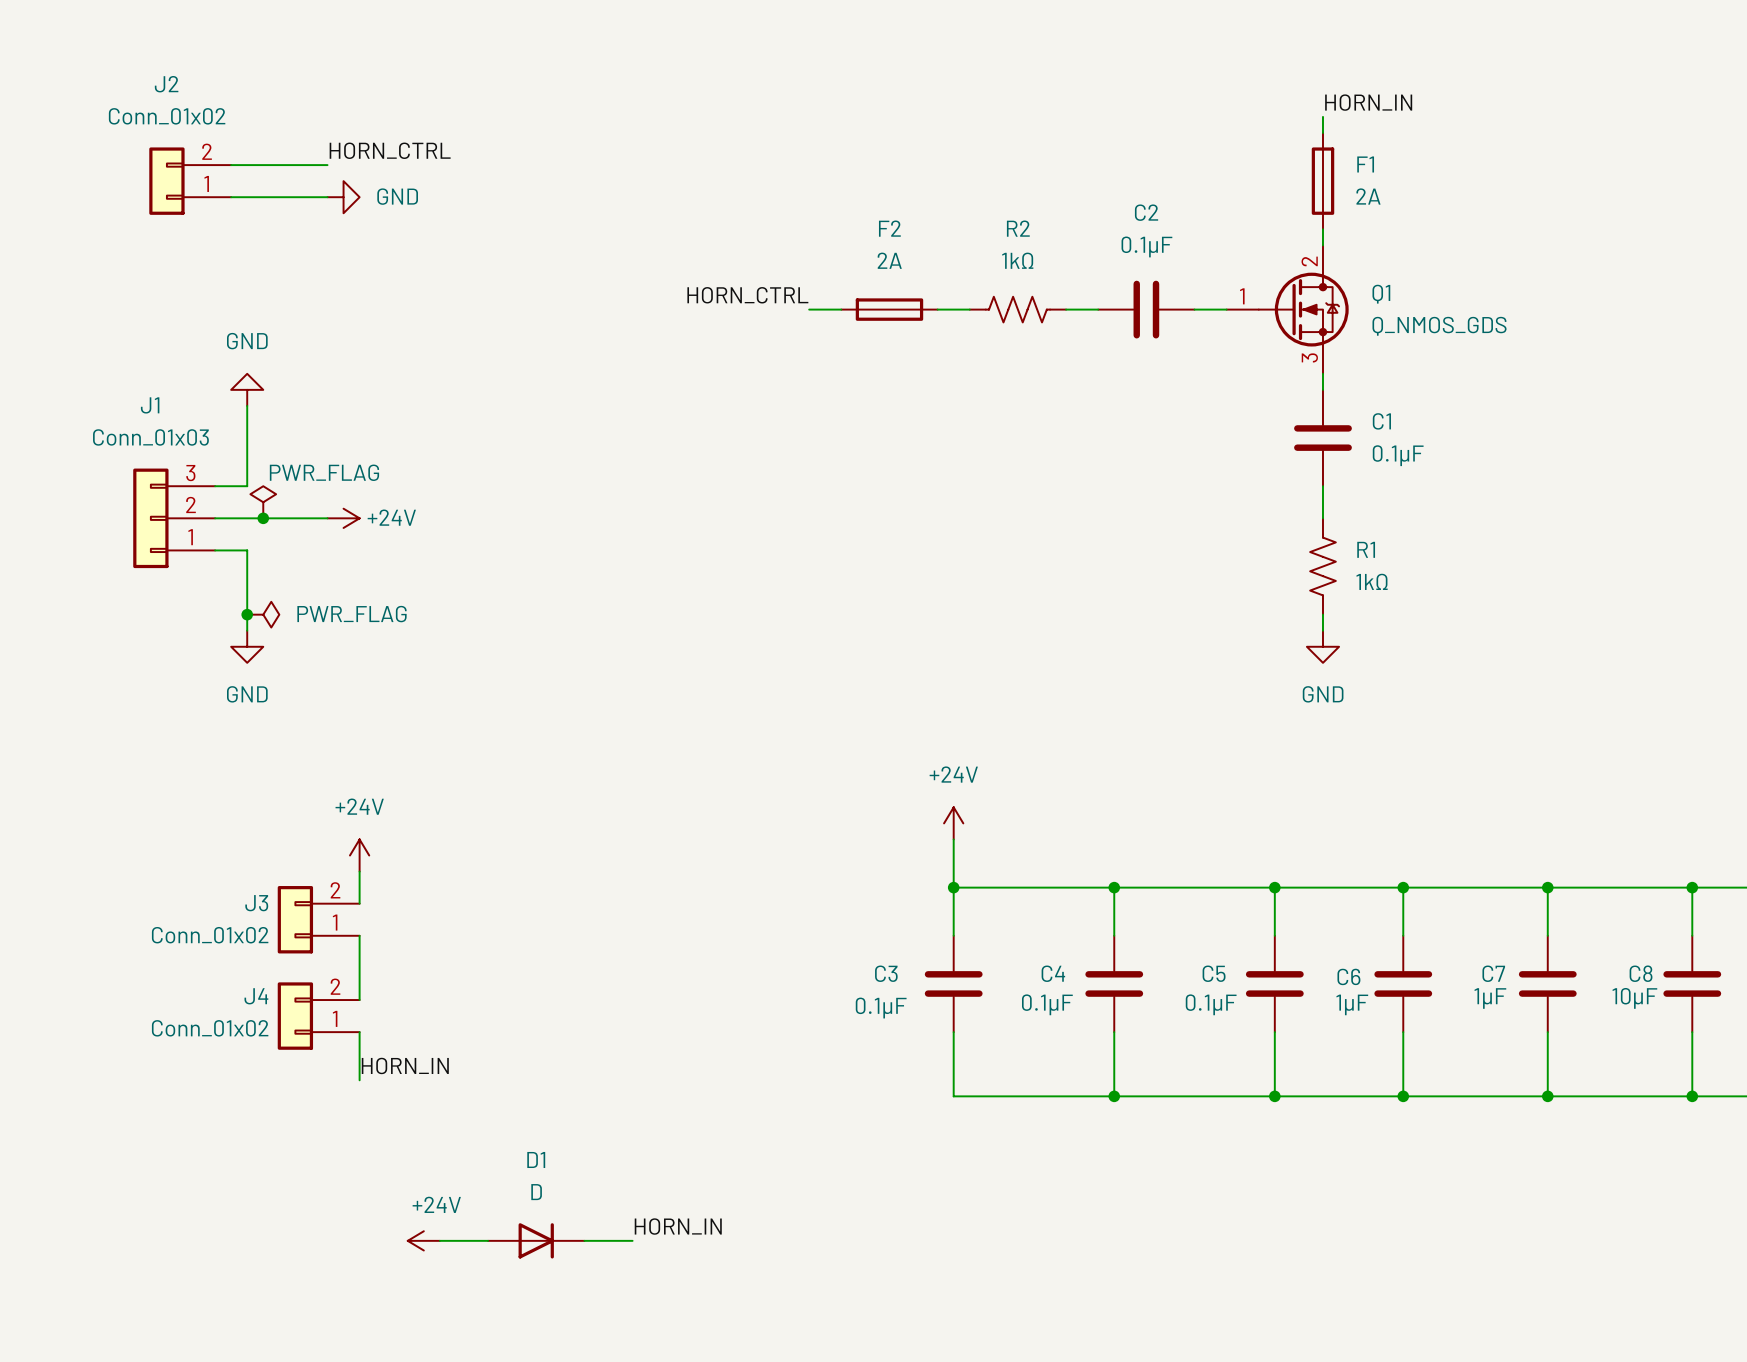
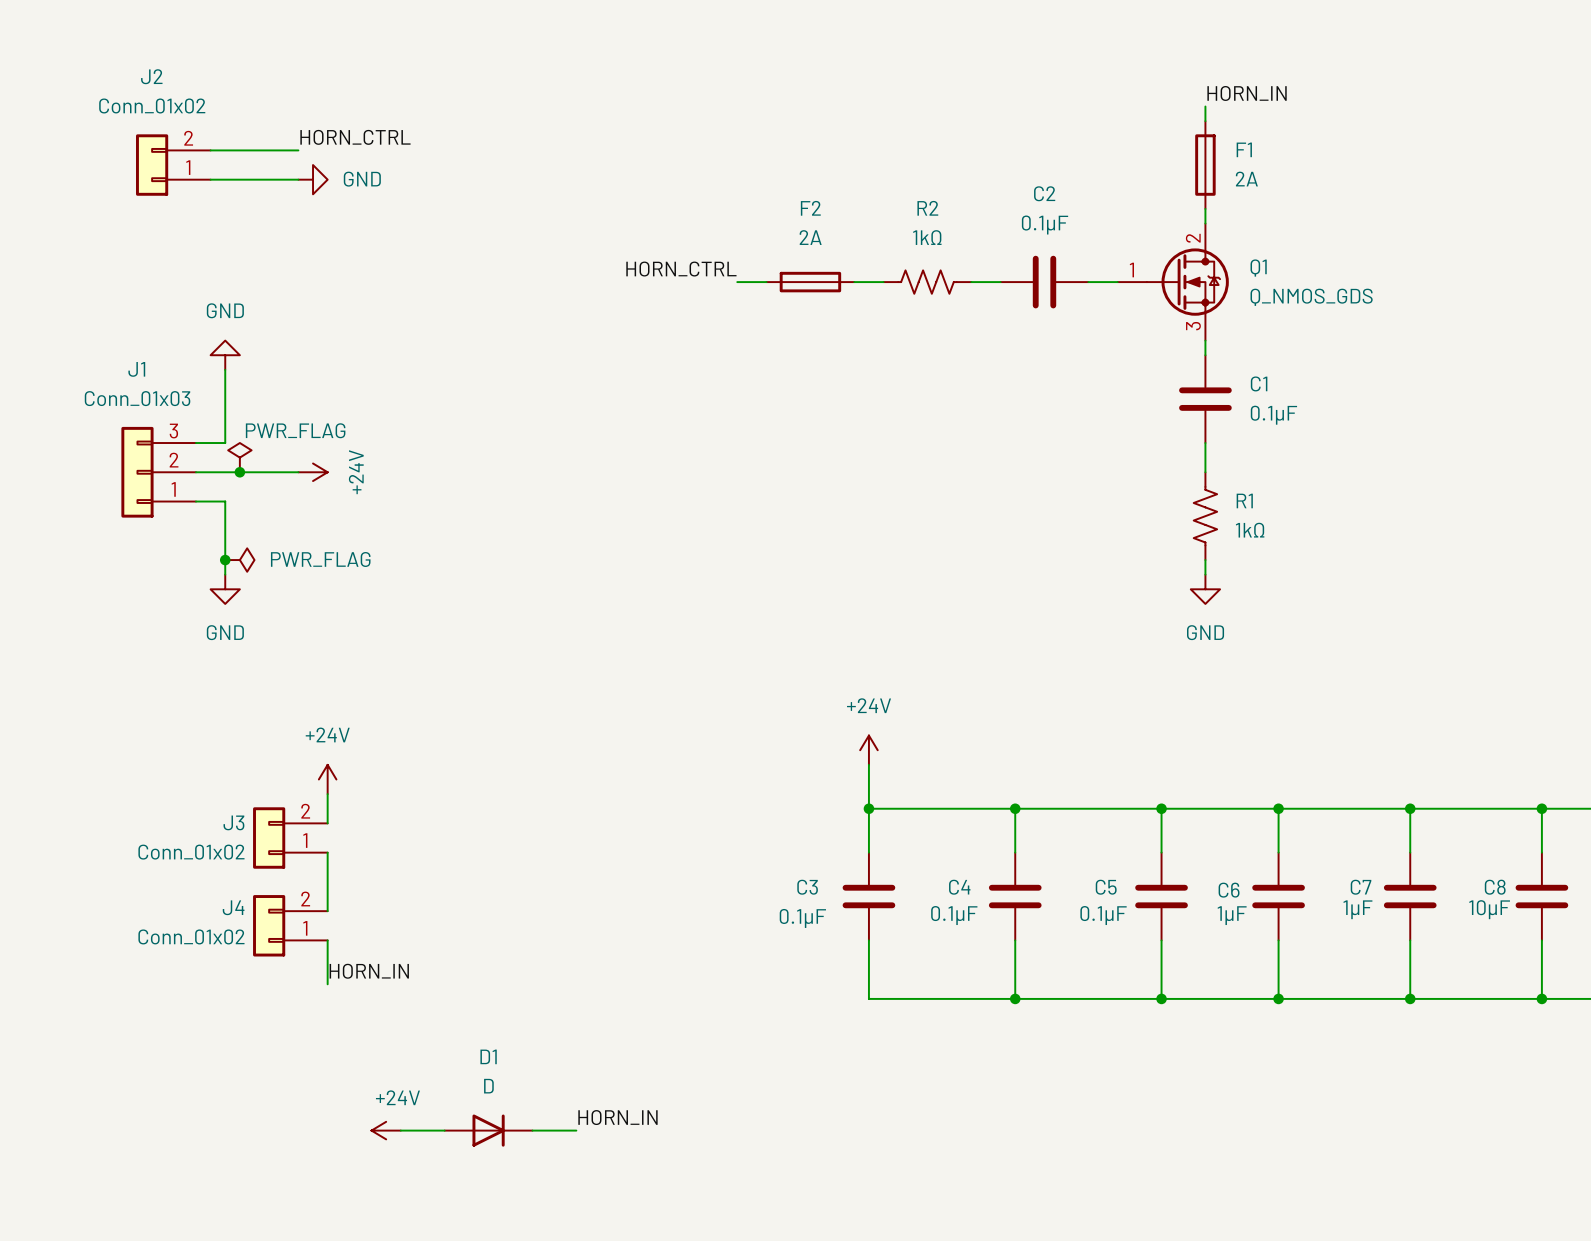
power symbol text rotation: 0° (391, 517) -> 90° counterclockwise (356, 472)

